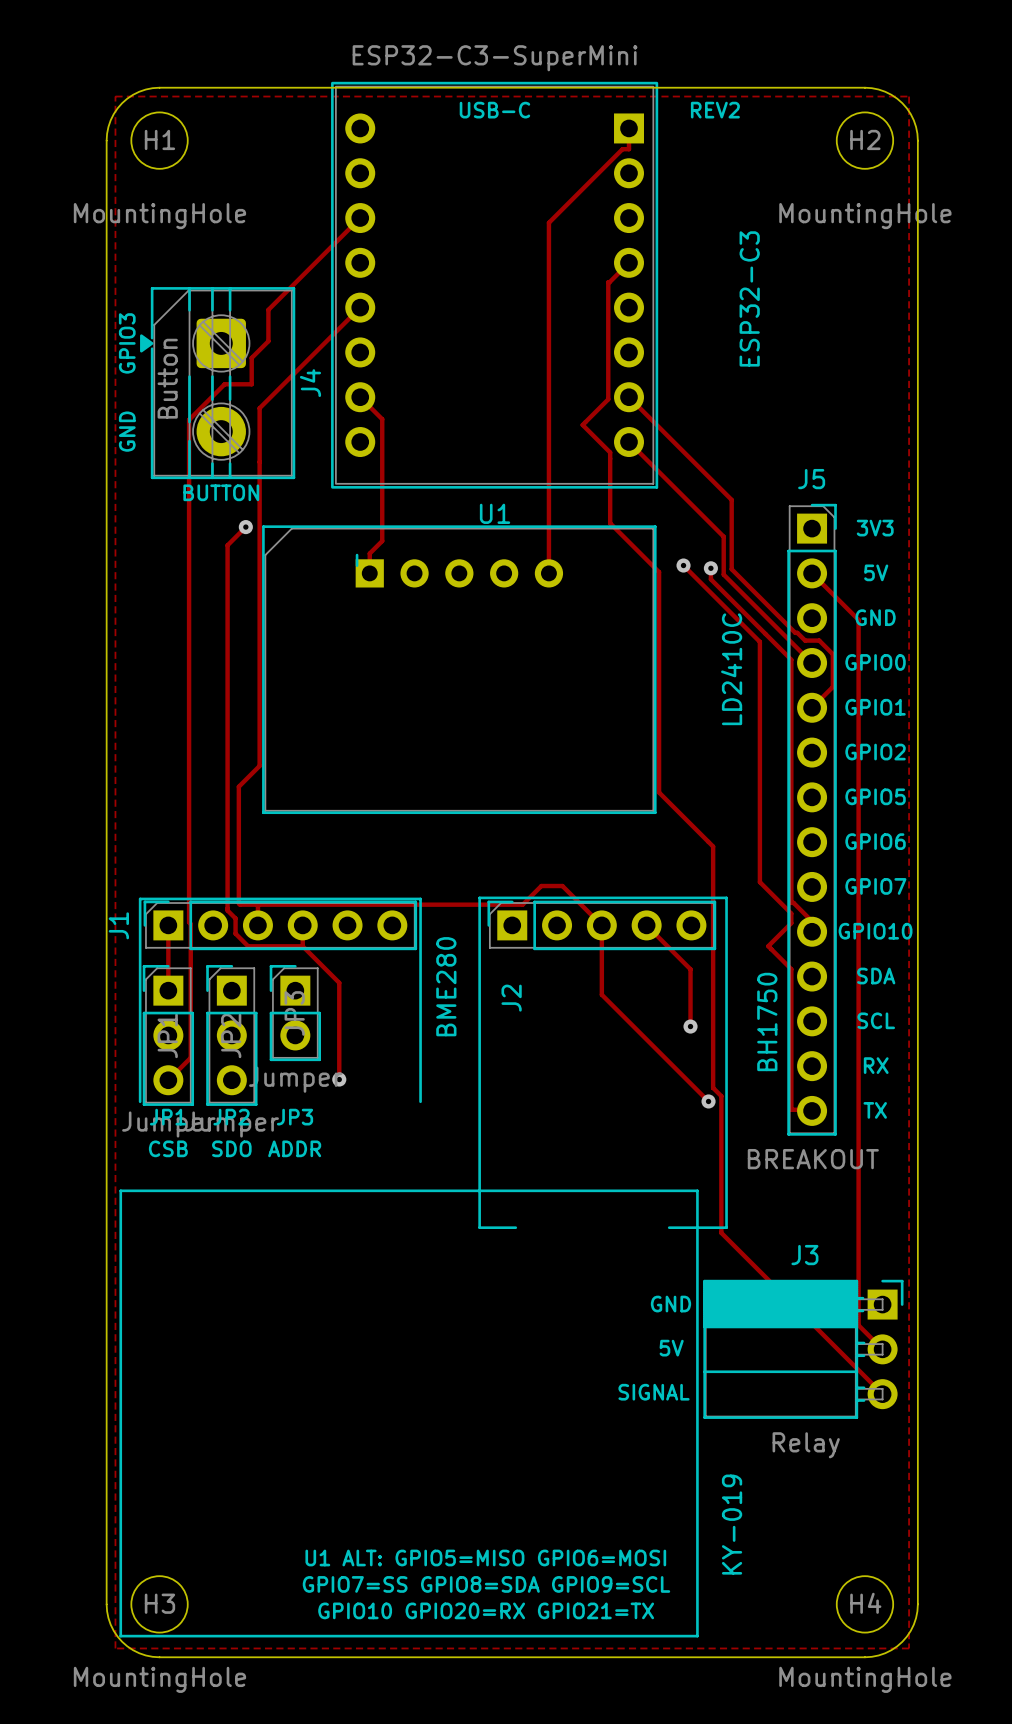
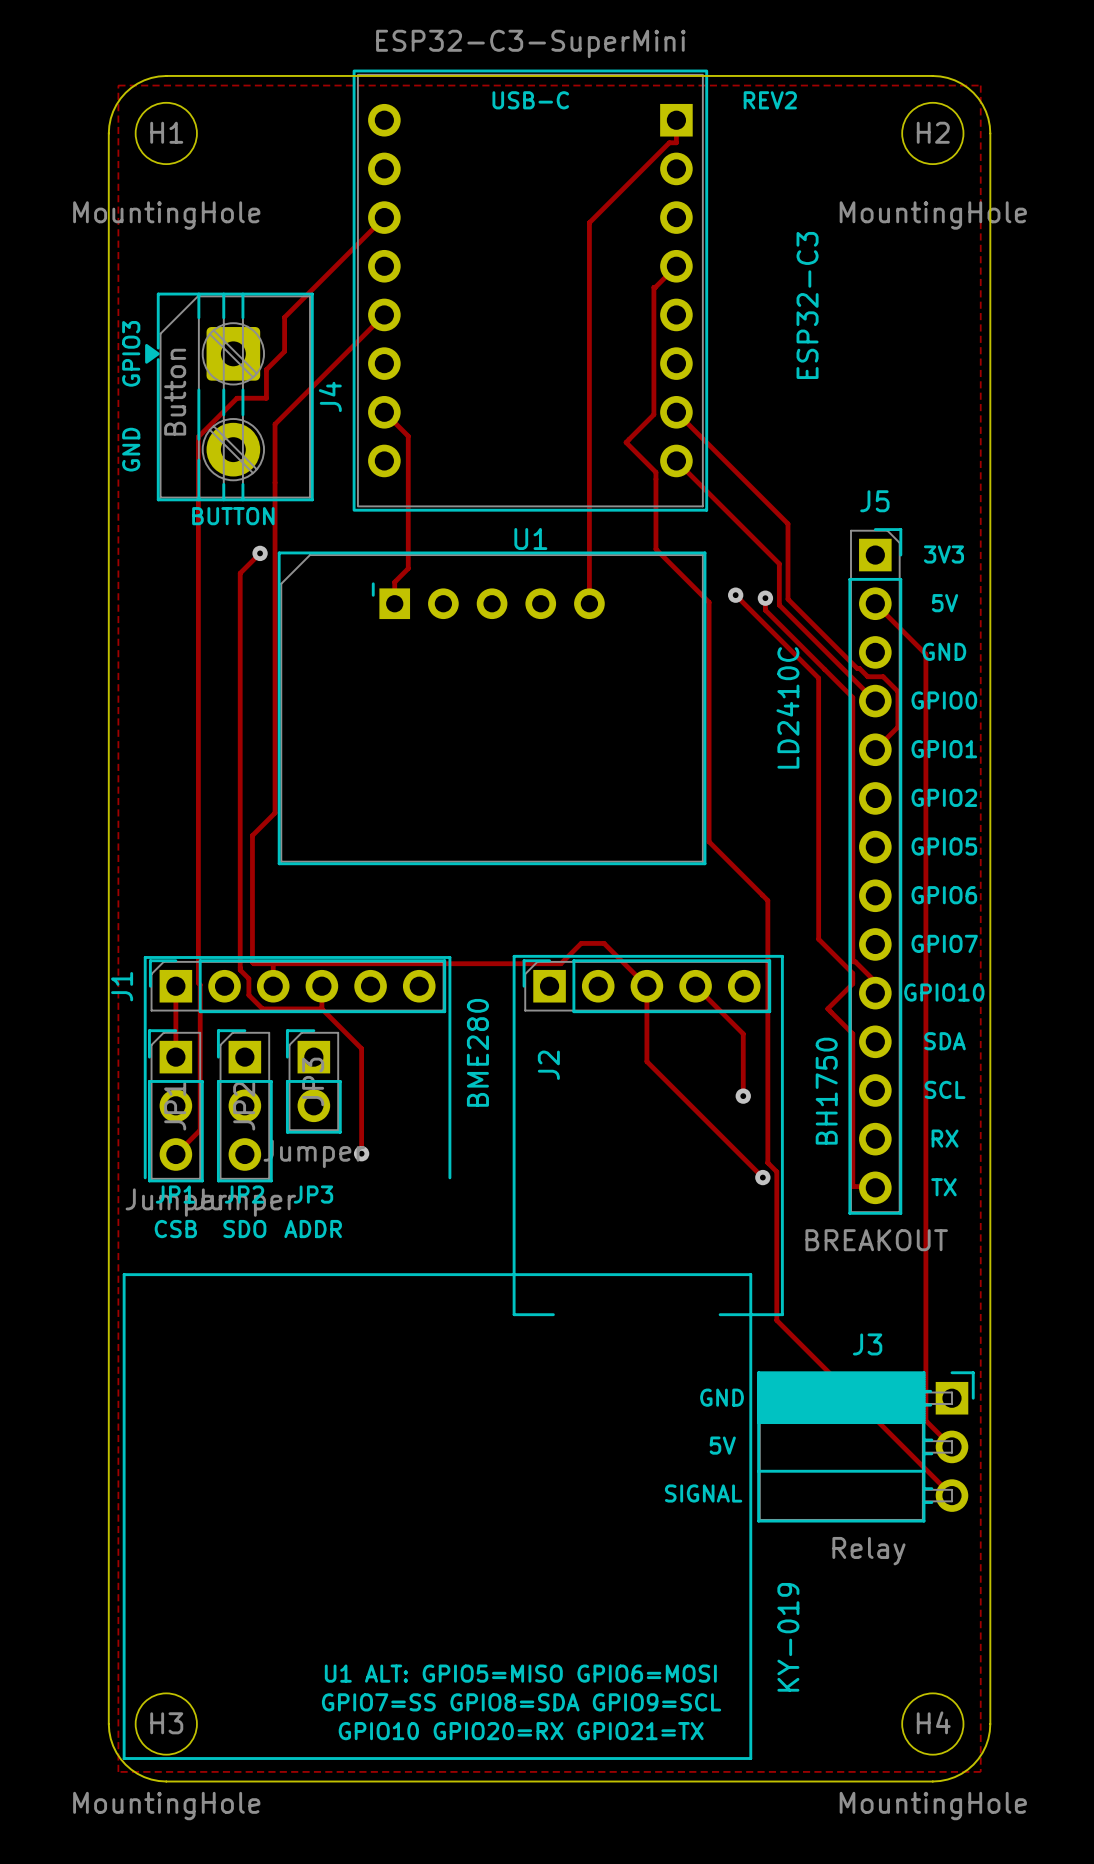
part footprint: [262, 525, 657, 815] -> [277, 551, 707, 866]

